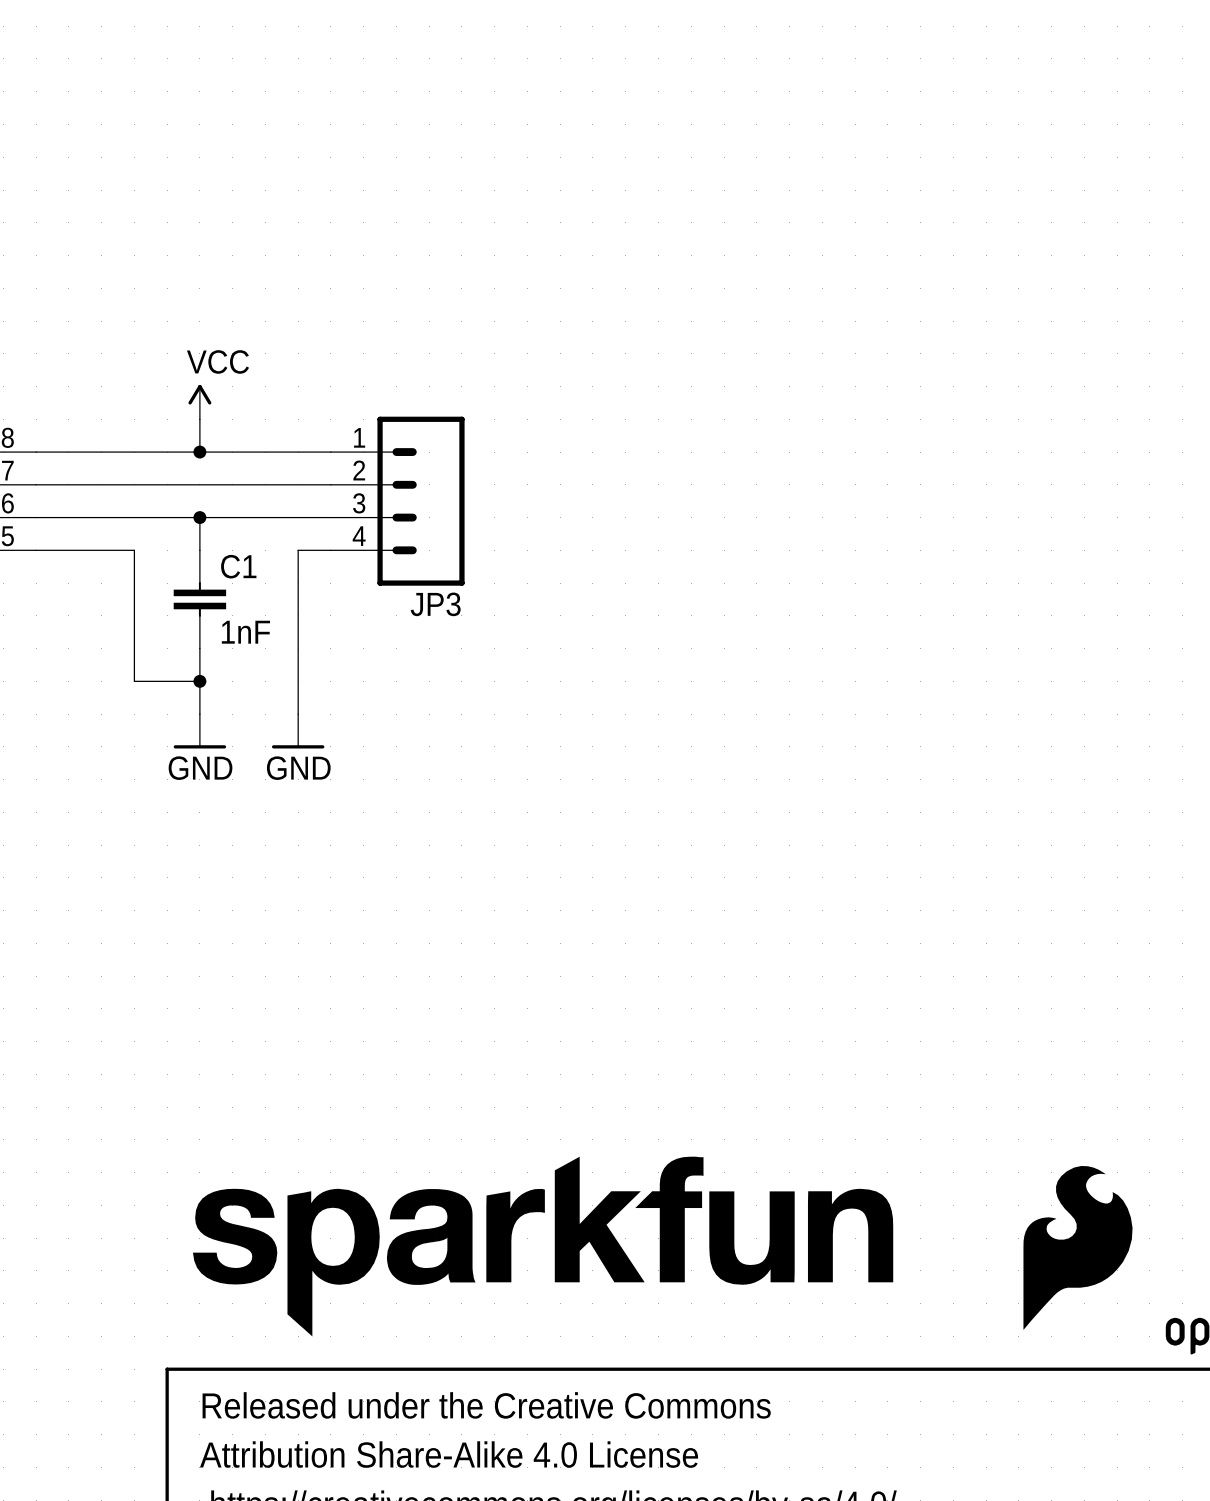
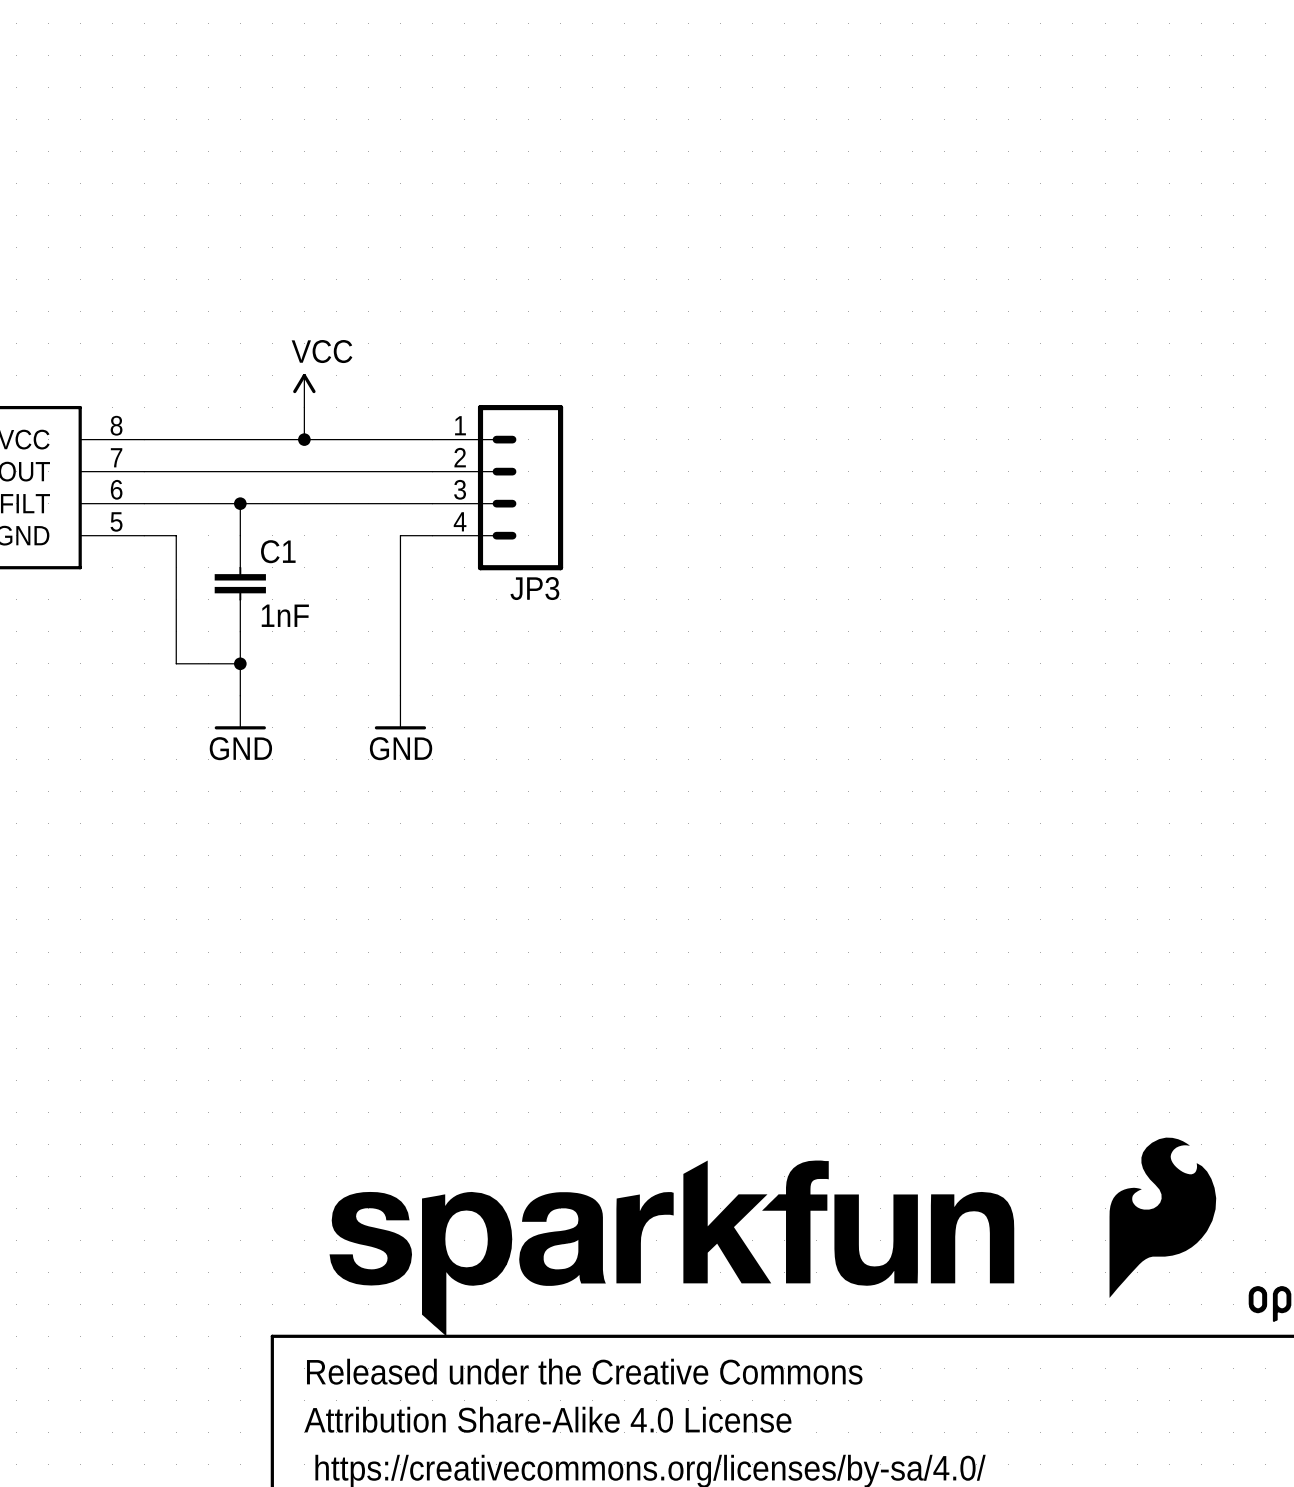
wire: (199, 517) (199, 550) -> (240, 503) (240, 535)
junction position: (199, 517) -> (240, 503)
wire: (68, 550) (134, 550) (134, 648) -> (176, 535) (176, 663) (240, 663) (240, 695)
C1 position: (199, 599) -> (240, 583)
wire: (199, 648) (199, 714) -> none
wire: (134, 681) (199, 681) -> none
junction position: (199, 681) -> (240, 663)
power symbol position: GND (199, 731) -> GND (240, 712)
part position: (543, 1246) -> (671, 1248)

